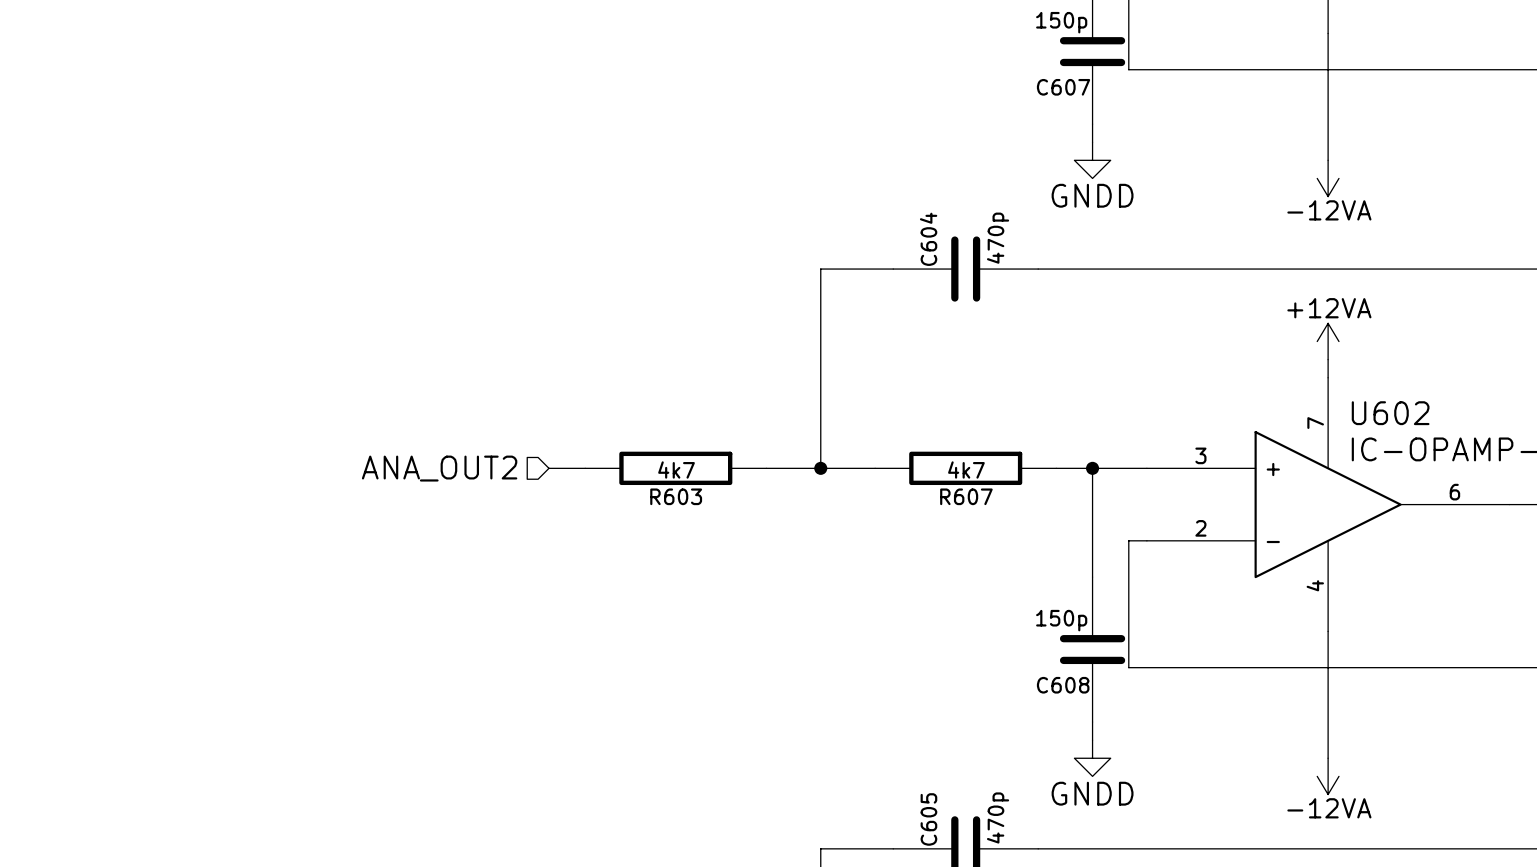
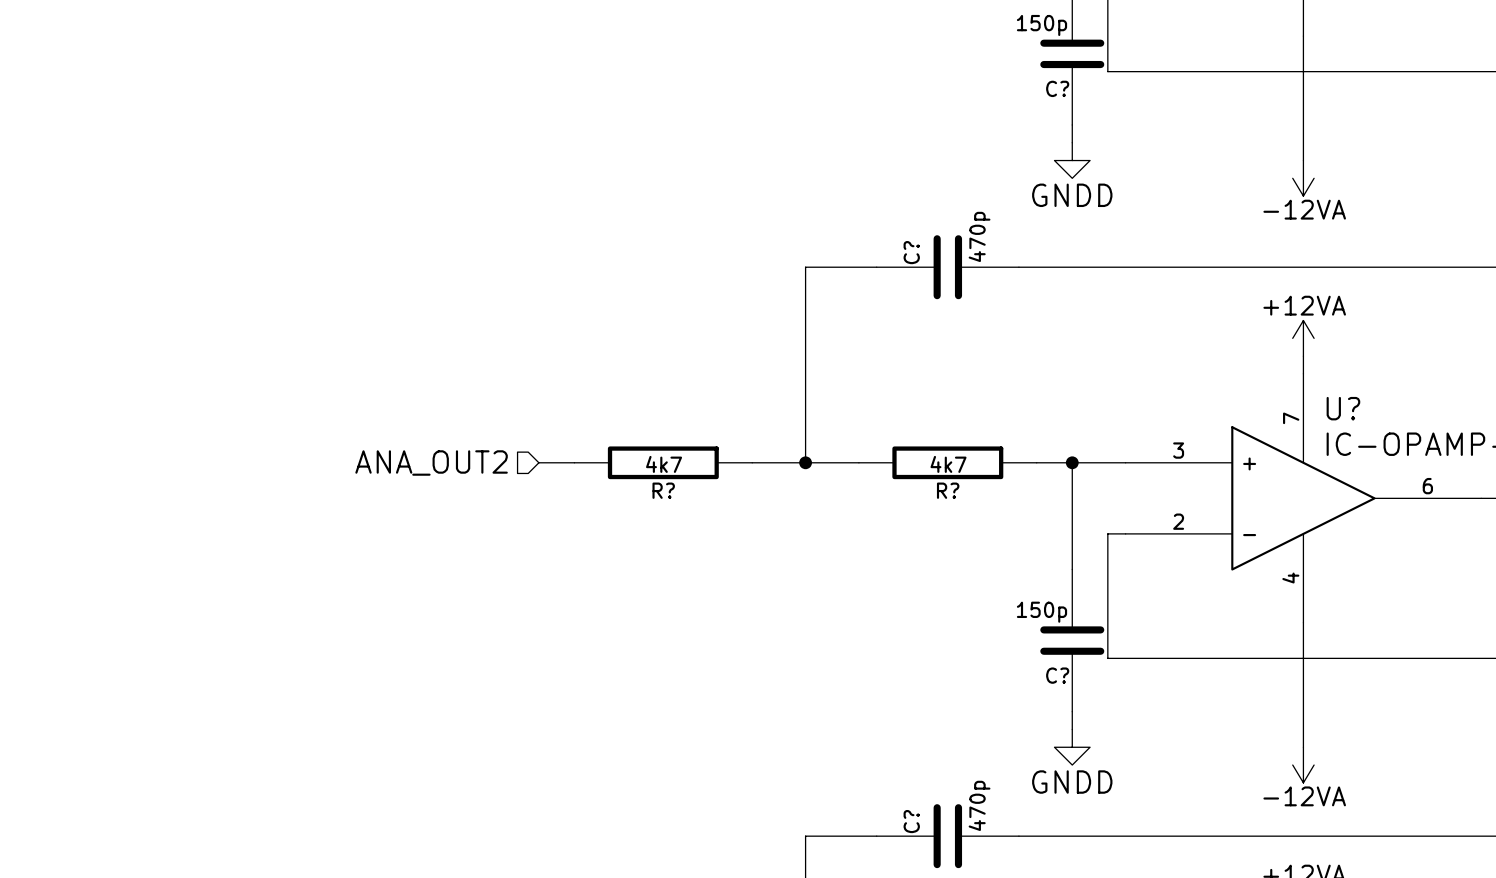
C607 name: C607 (1063, 87) -> C? (1057, 88)
C604 name: C604 (928, 239) -> C? (911, 252)
U602 name: U602 (1390, 413) -> U? (1343, 408)
R603 name: R603 (676, 496) -> R? (663, 490)
R607 name: R607 (966, 496) -> R? (948, 490)
C608 name: C608 (1063, 685) -> C? (1057, 675)
C605 name: C605 (928, 819) -> C? (911, 821)

